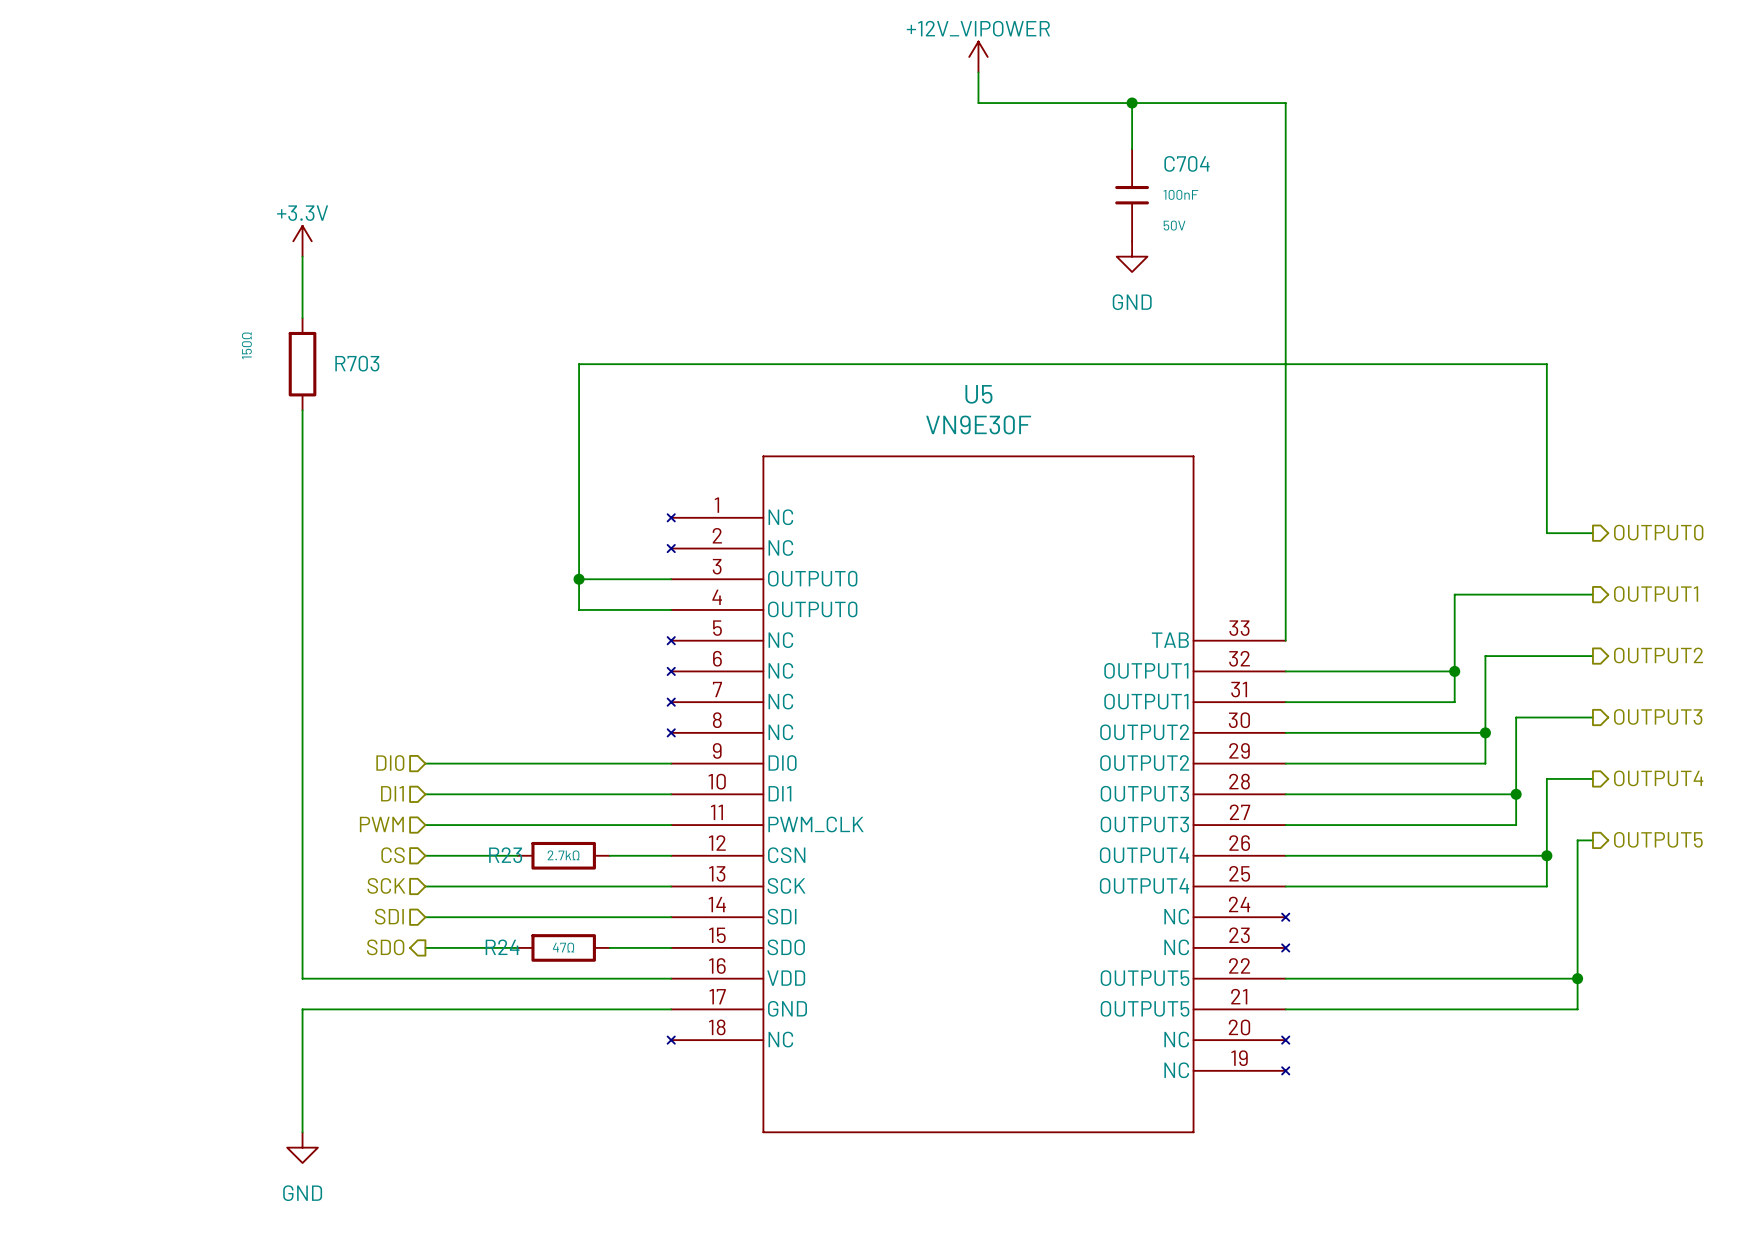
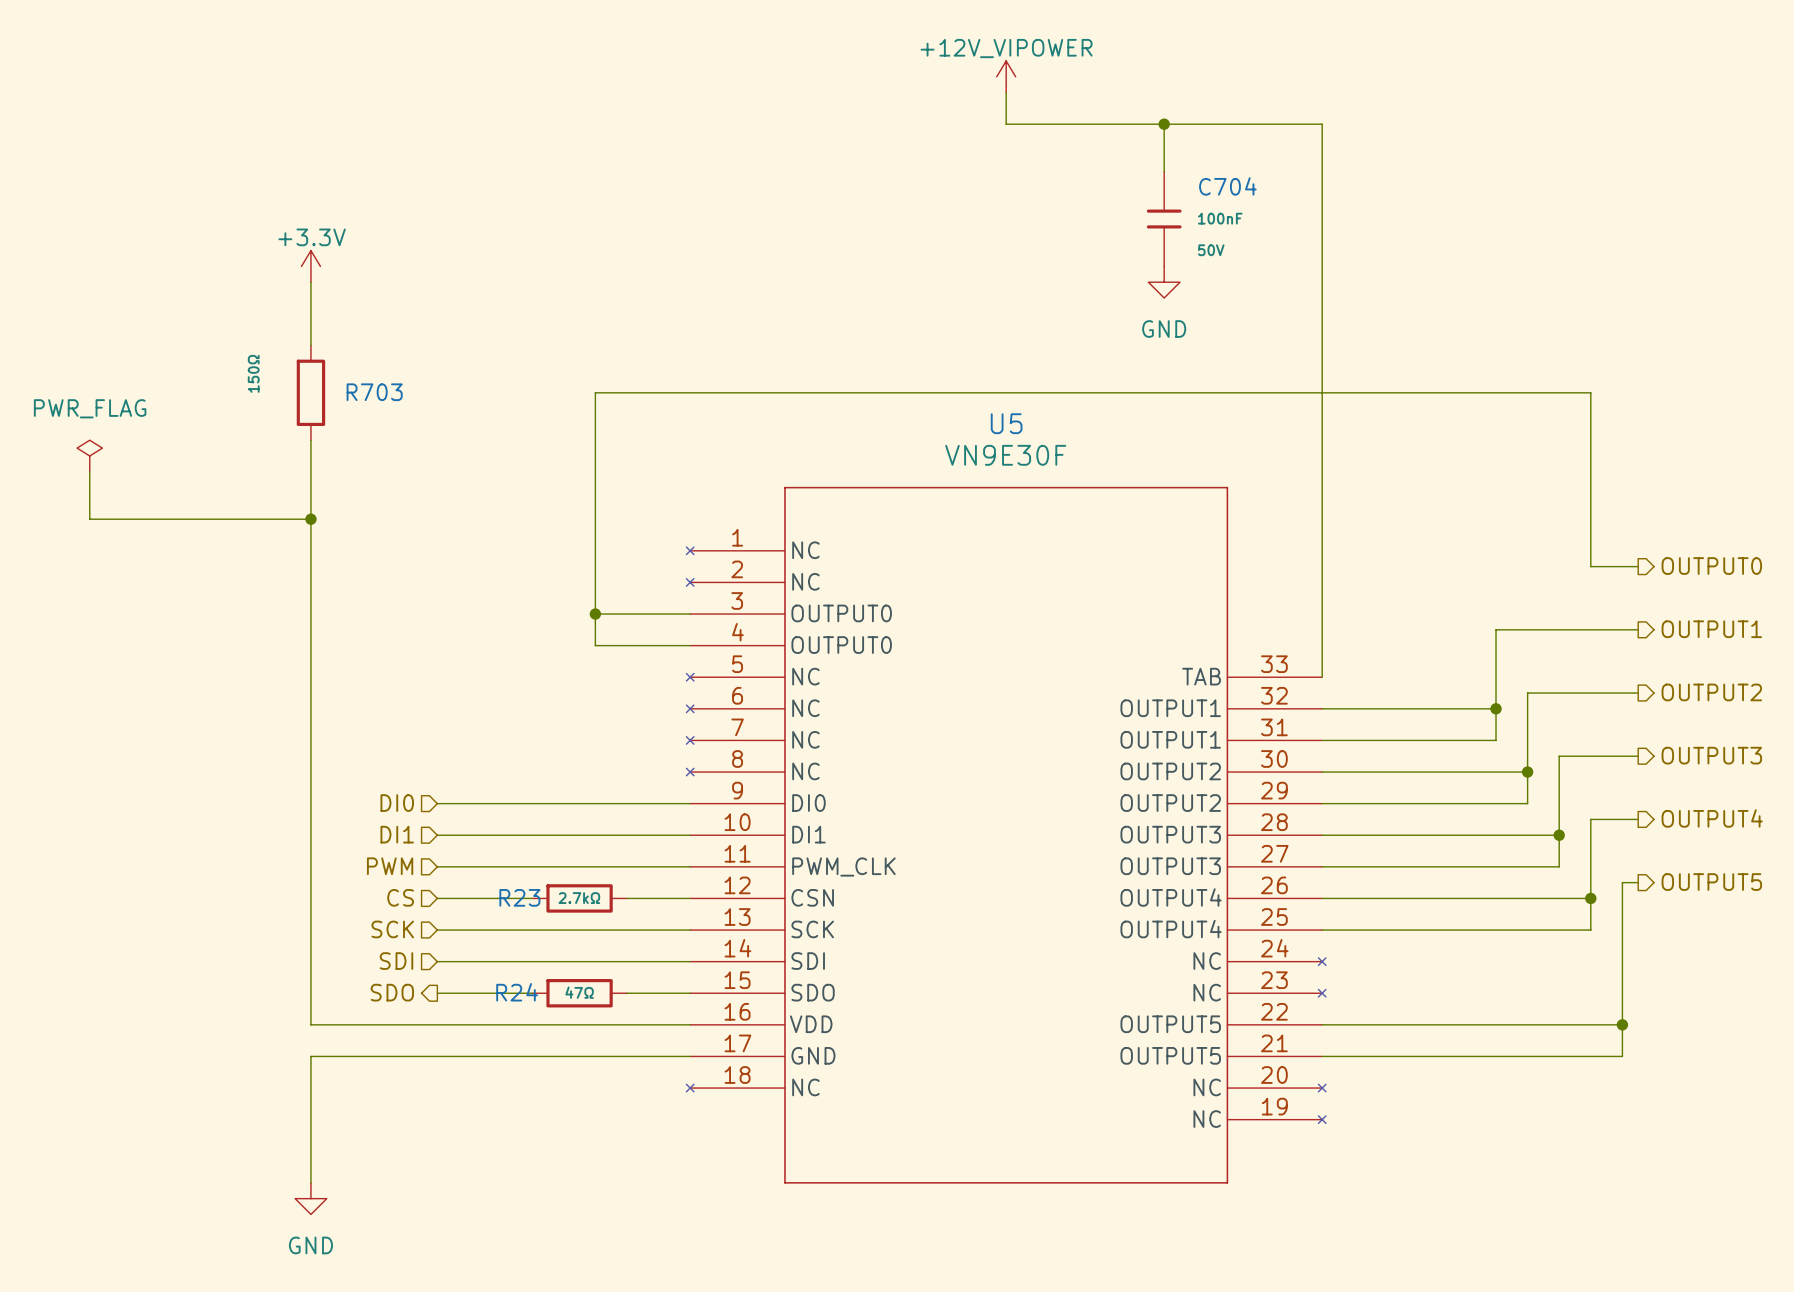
power symbol: none -> PWR_FLAG (89, 456)
wire: none -> (89, 471) (89, 519) (310, 519)
junction: none -> (310, 519)

